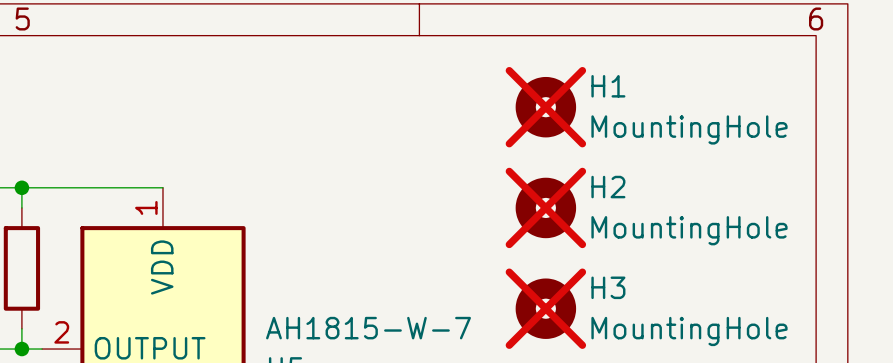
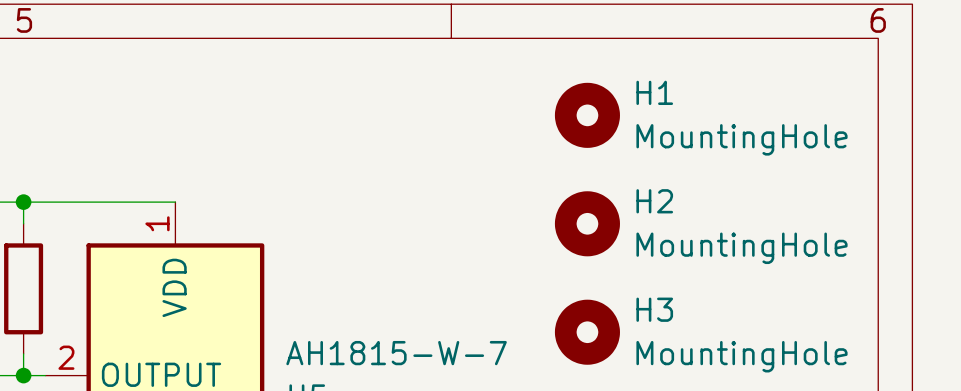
H1 do-not-place cross: (545, 107) -> none
H2 do-not-place cross: (545, 207) -> none
H3 do-not-place cross: (545, 308) -> none

